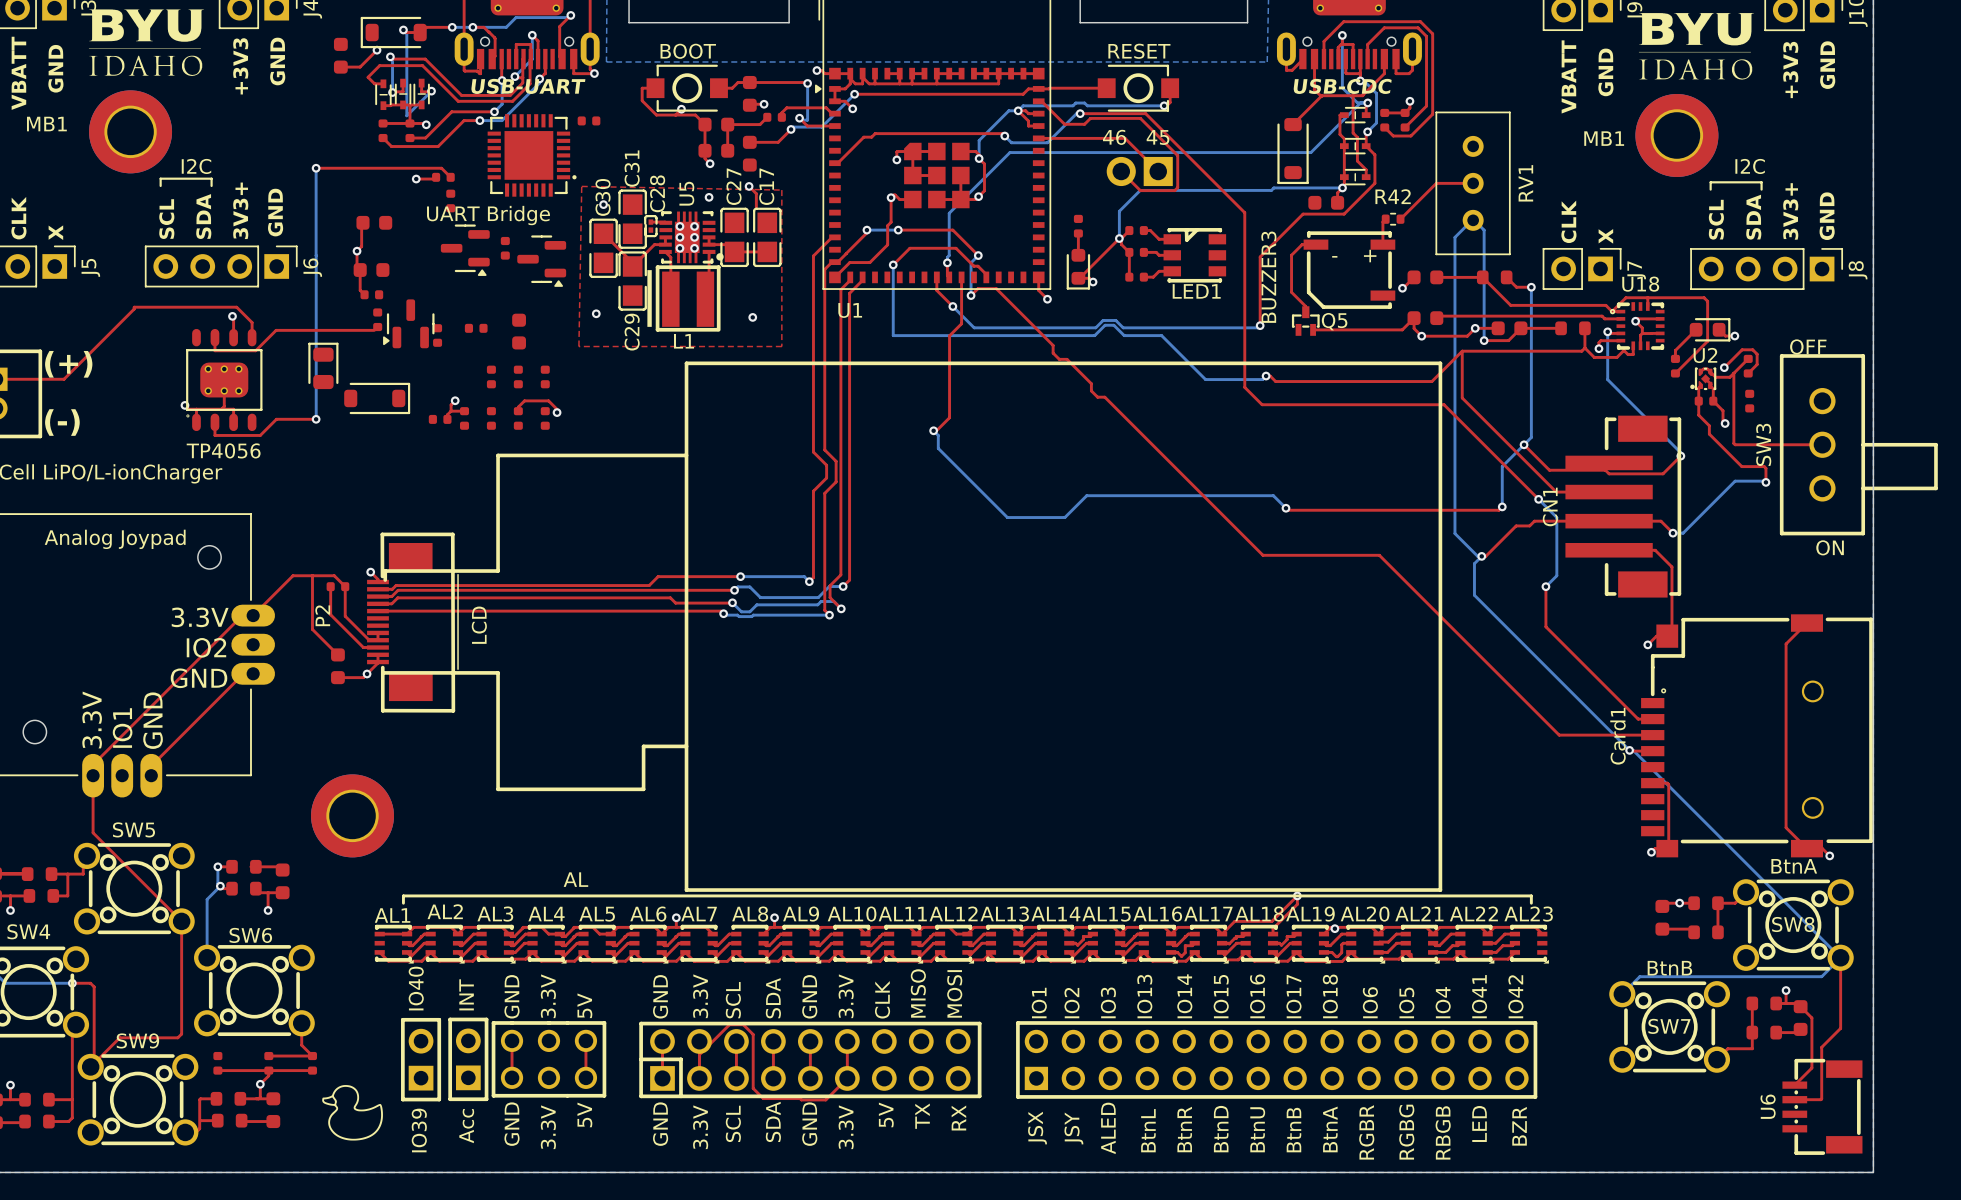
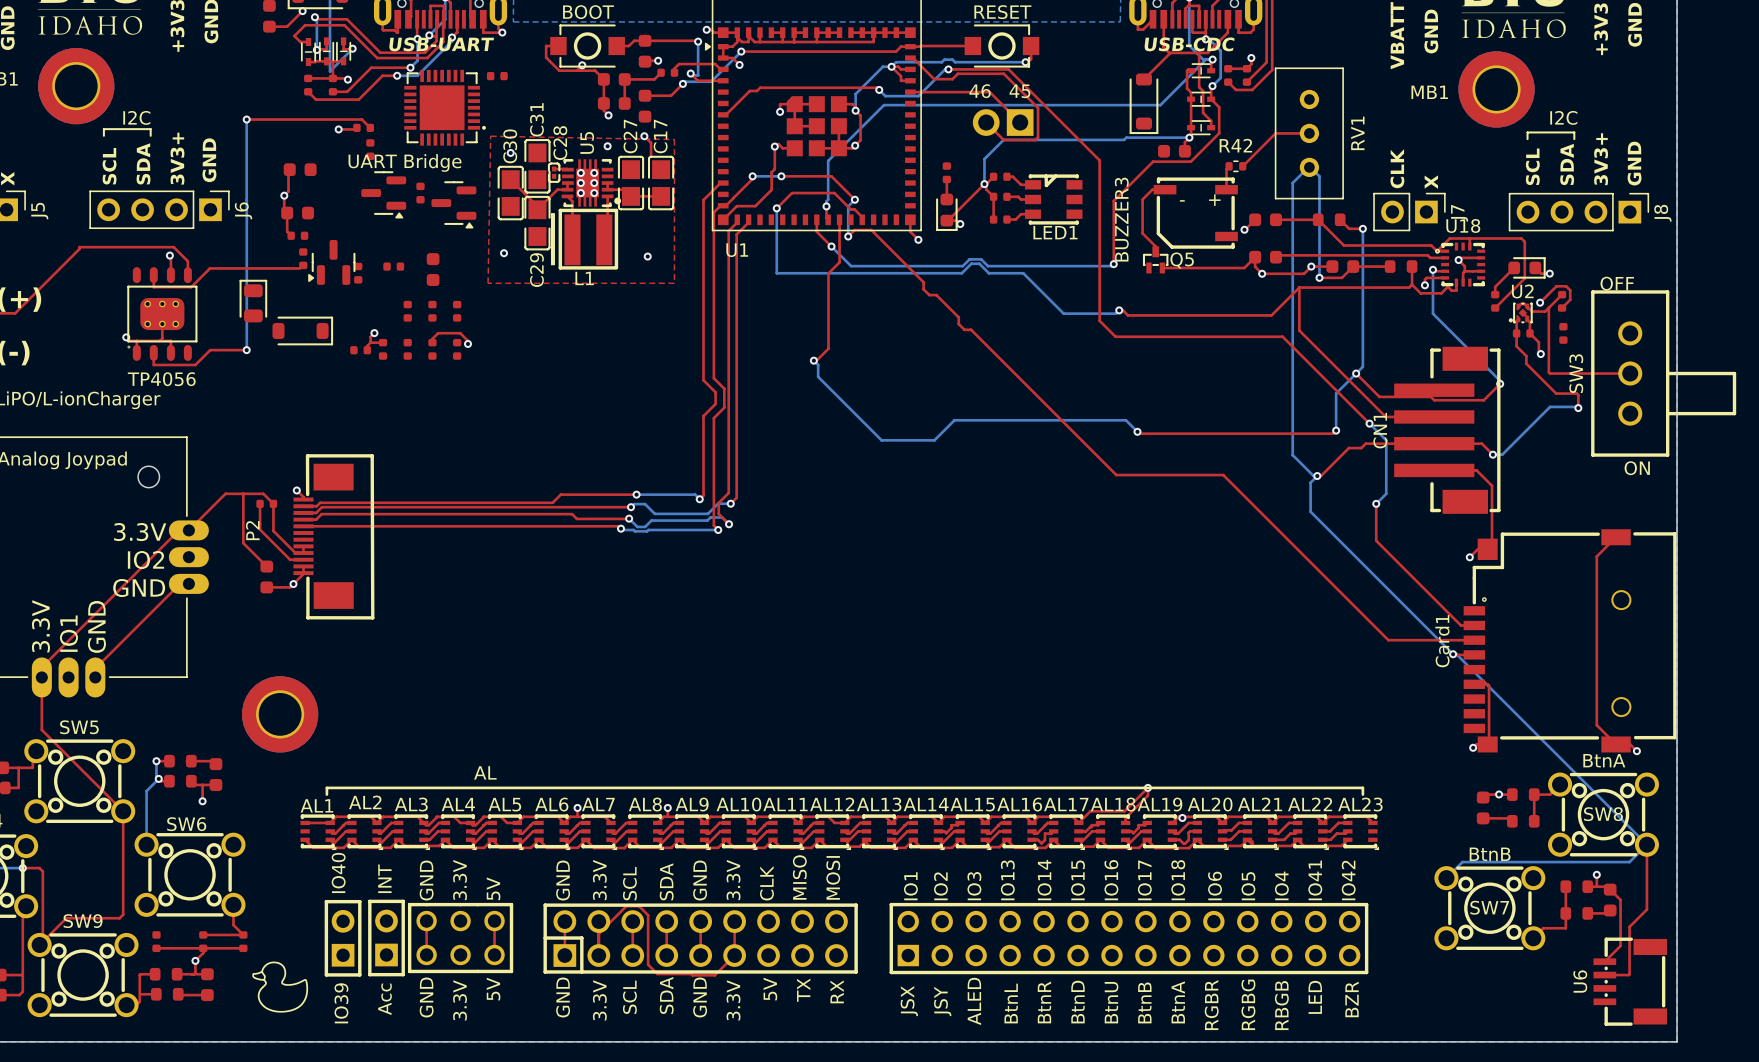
LCD: (912, 626) -> none

